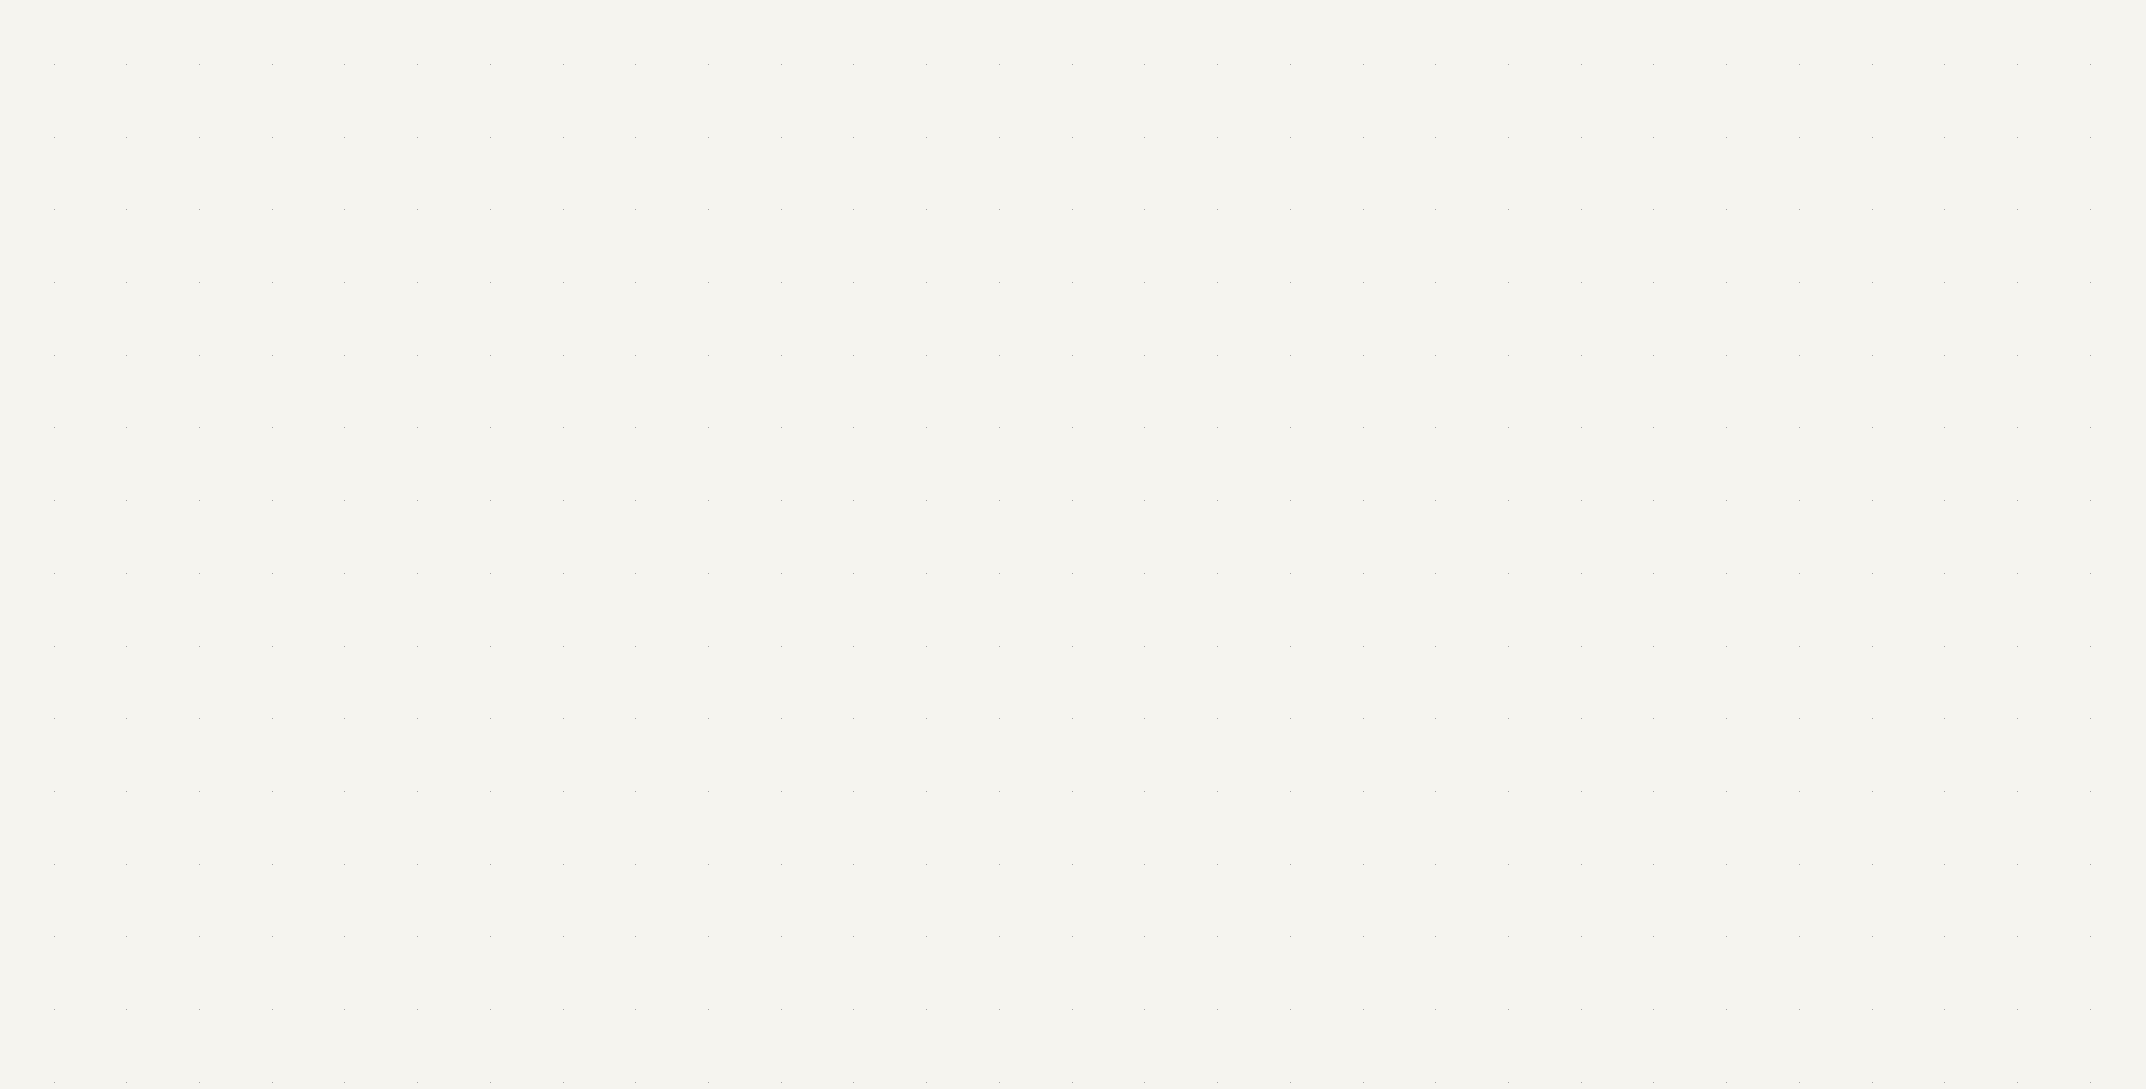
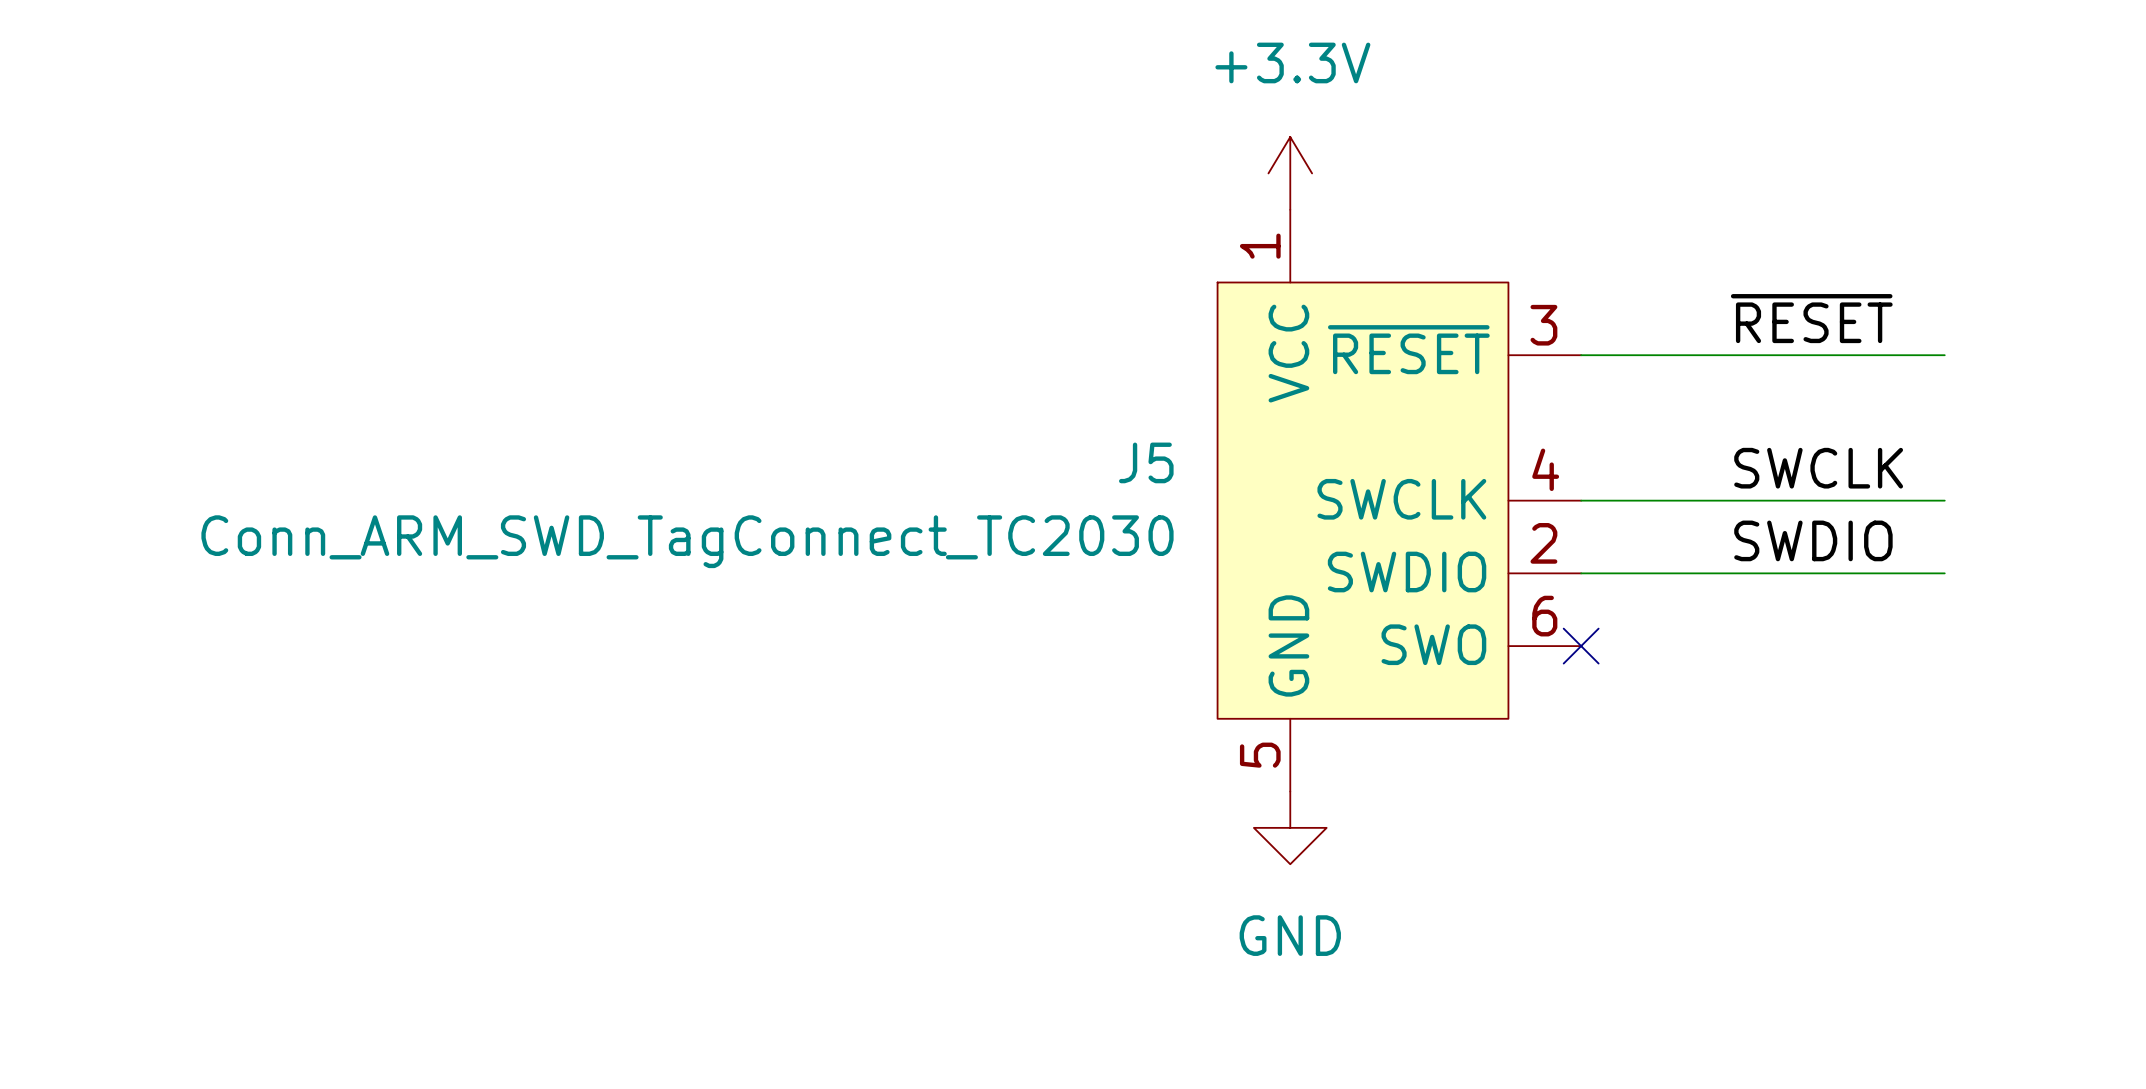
power symbol: none -> +3.3V (1290, 173)
label: none -> ~{RESET} (1811, 318)
wire: none -> (1581, 355) (1944, 355)
label: none -> SWCLK (1818, 468)
J5: none -> Conn_ARM_SWD_TagConnect_TC2030 (1399, 500)
wire: none -> (1581, 500) (1944, 500)
label: none -> SWDIO (1813, 540)
wire: none -> (1581, 573) (1944, 573)
no-connect mark: none -> (1581, 646)
power symbol: none -> GND (1290, 827)

